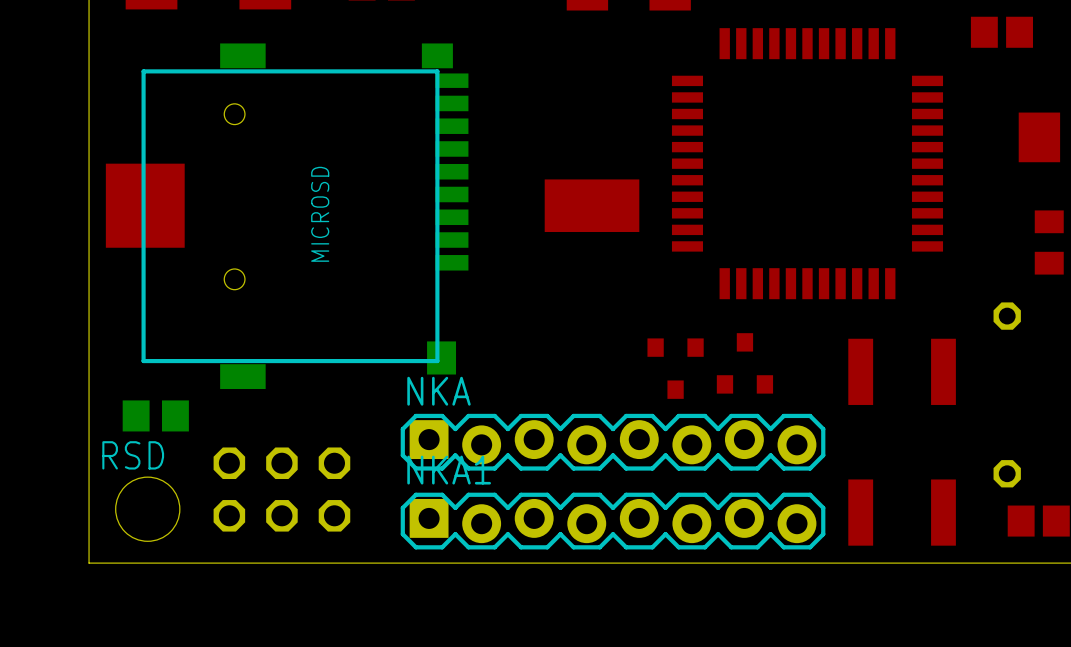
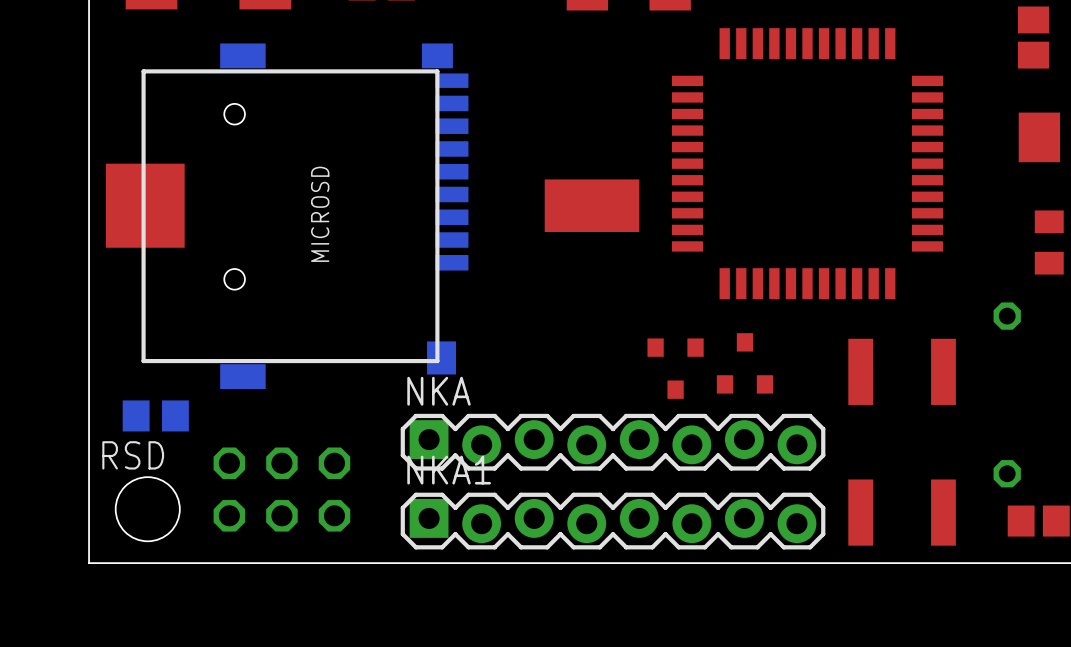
part rotation: 0° (1001, 32) -> 90° clockwise (1033, 37)

